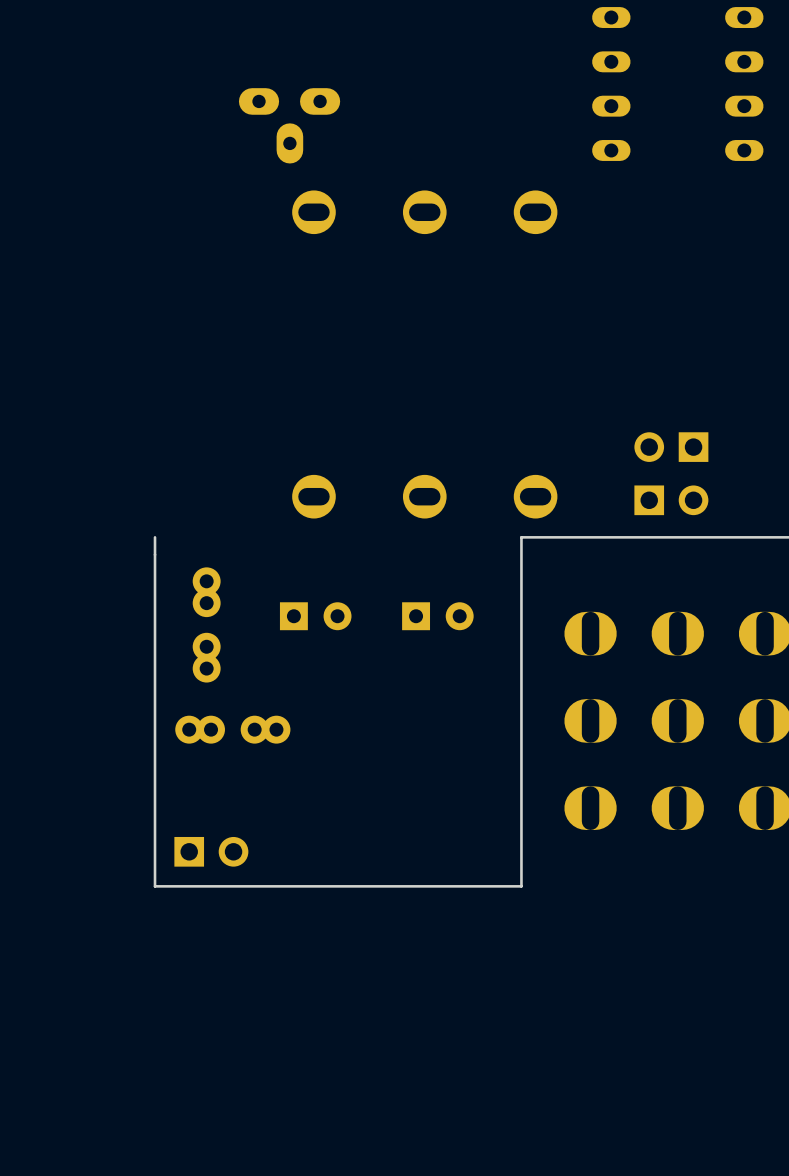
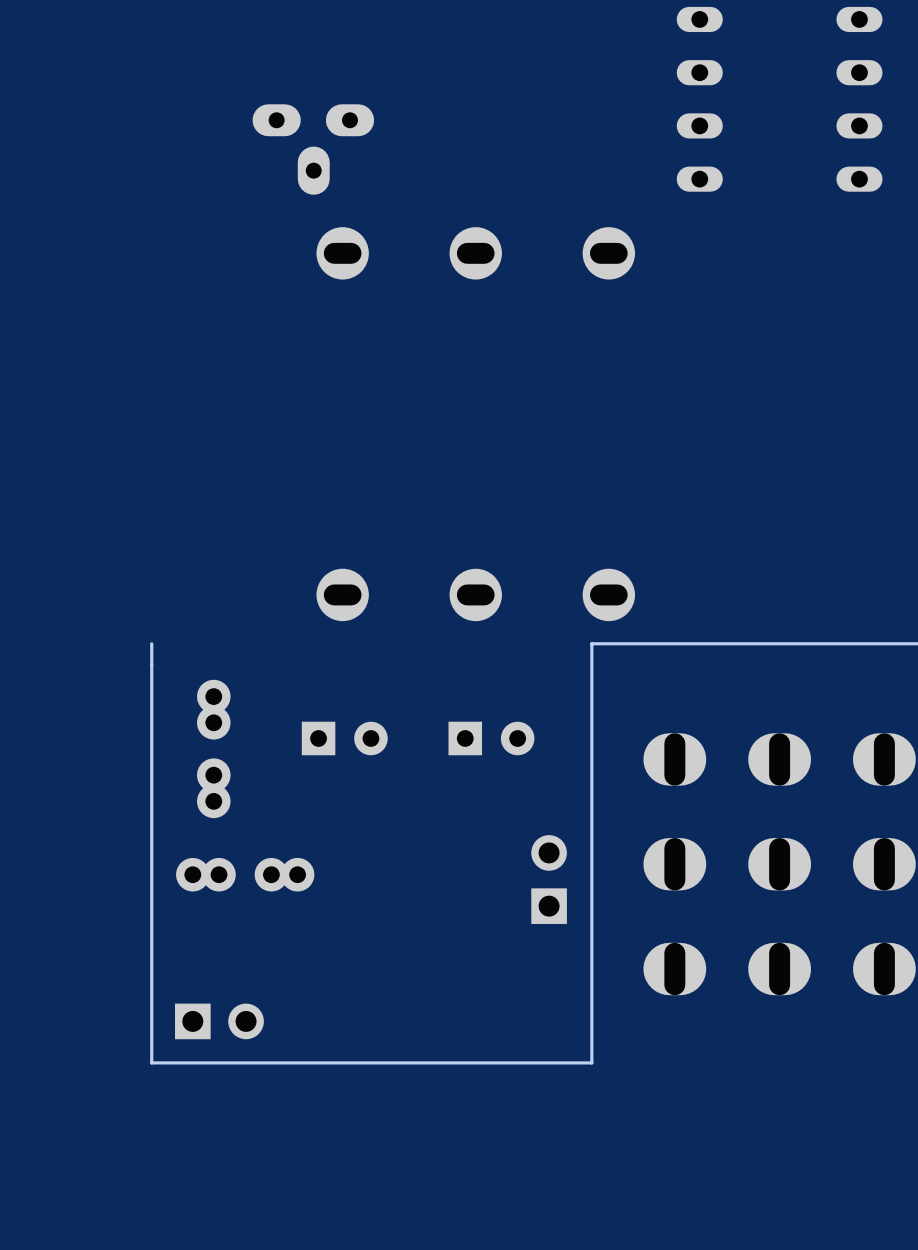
part: (671, 447) -> none
part: (671, 500) -> none
part: none -> (549, 879)

